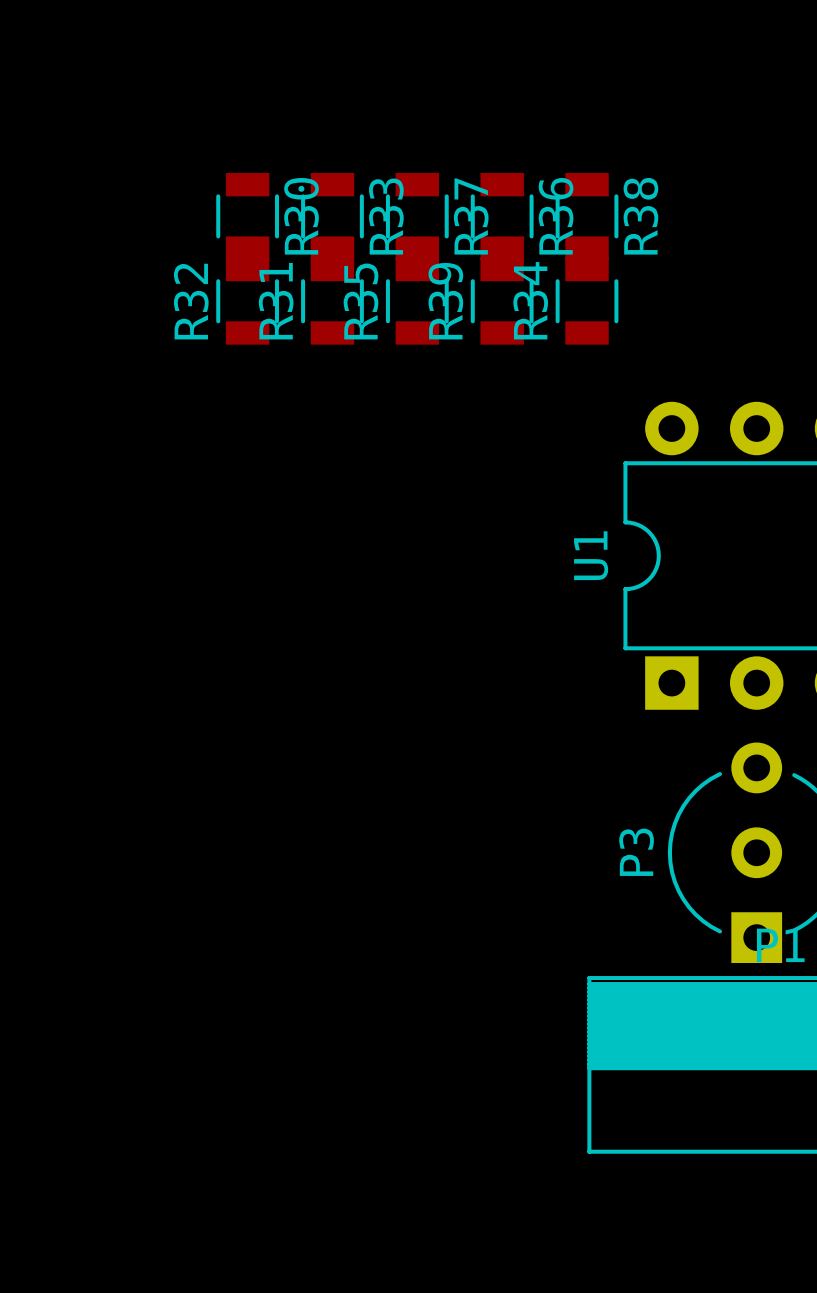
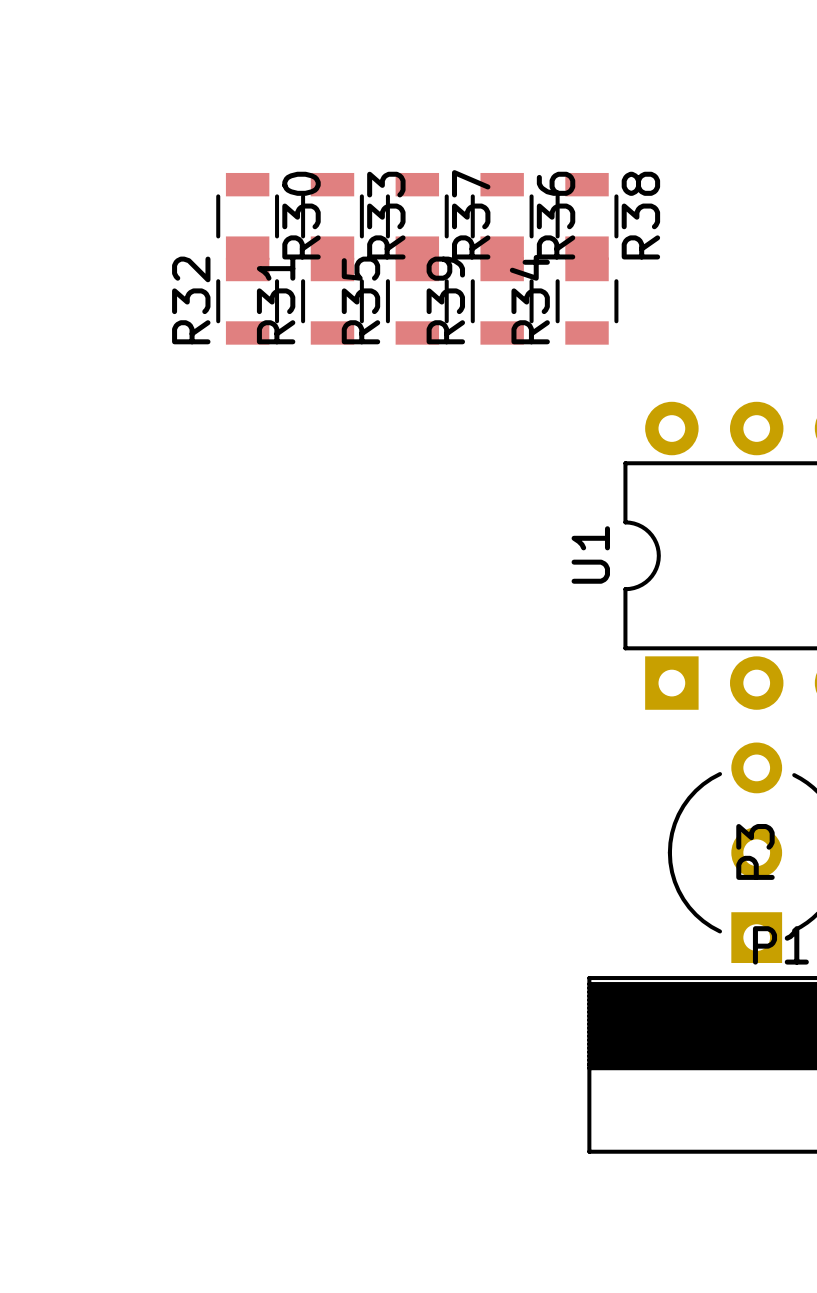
P3 name position: P3 (636, 852) -> P3 (755, 851)

